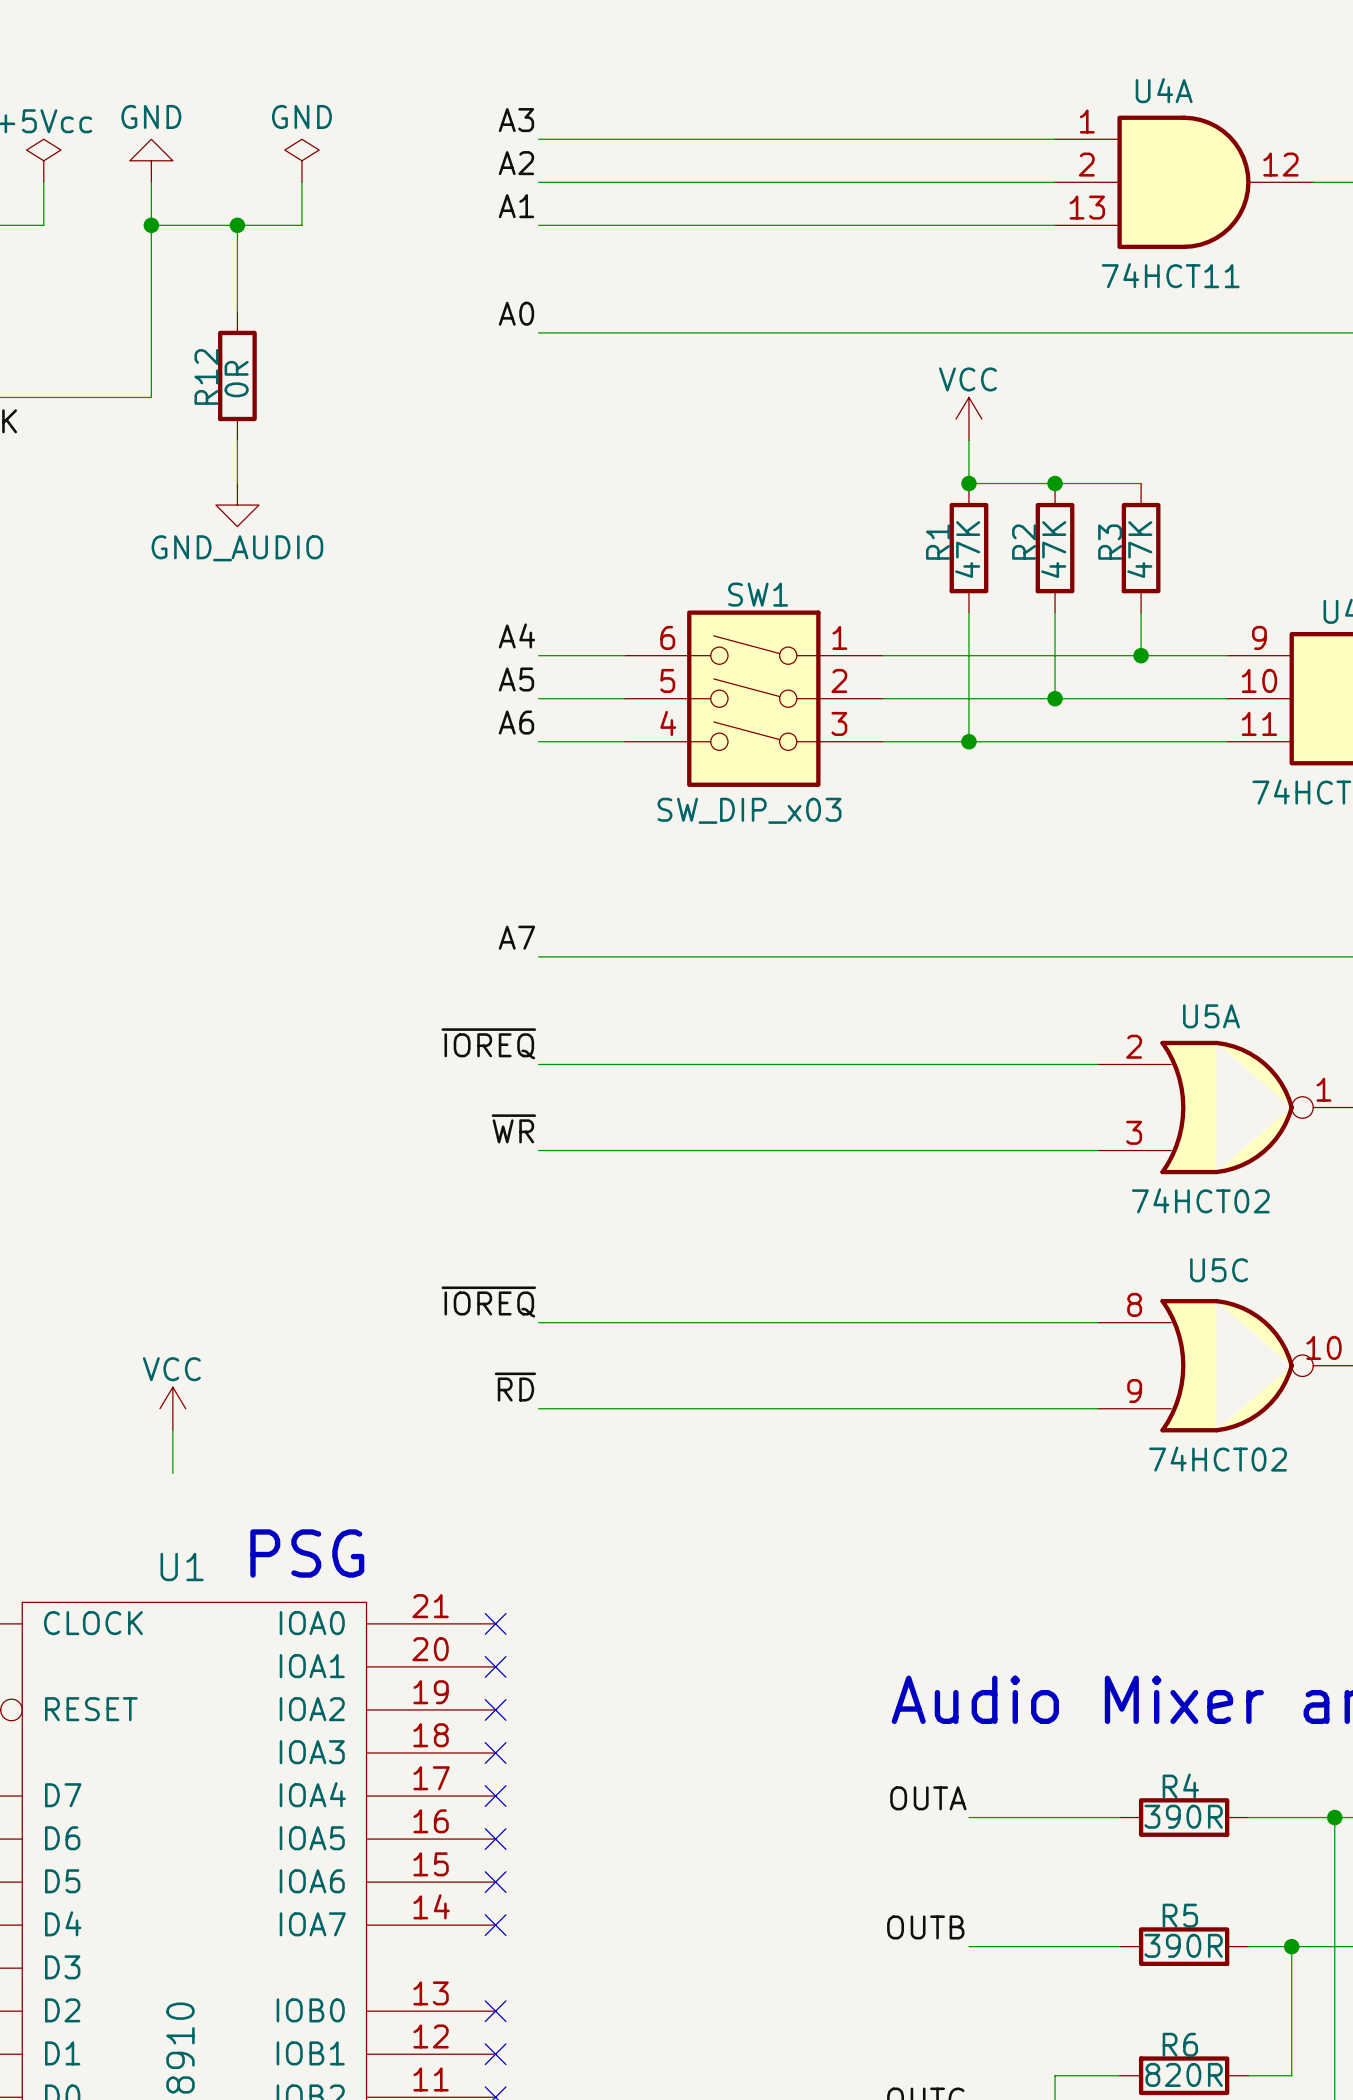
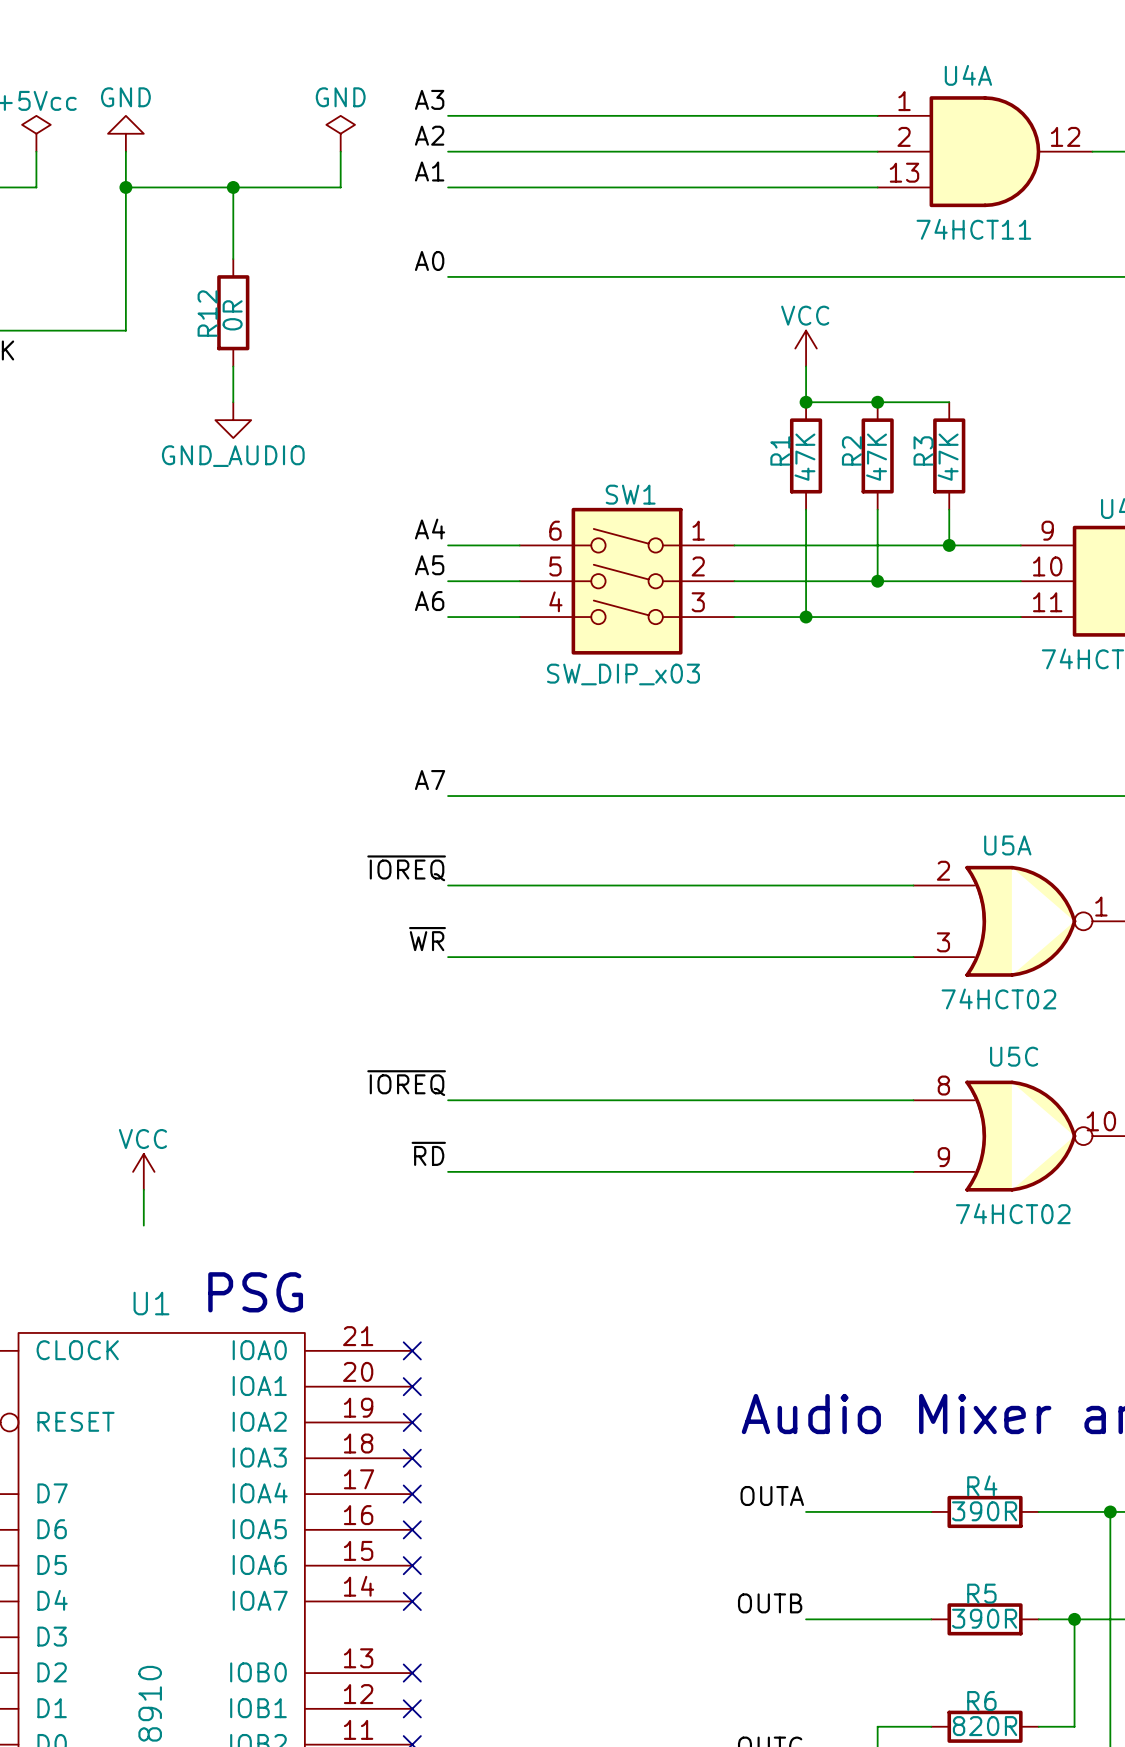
power symbol position: GND (301, 160) -> GND (340, 133)
wire: (301, 182) (301, 225) -> (340, 151) (340, 187) (251, 187)
wire: (237, 225) (237, 311) -> (233, 187) (233, 259)
junction position: (237, 225) -> (233, 187)
R12 position: (237, 375) -> (233, 312)
wire: (237, 440) (237, 483) -> (233, 366) (233, 402)
power symbol position: GND_AUDIO (237, 505) -> GND_AUDIO (233, 420)

